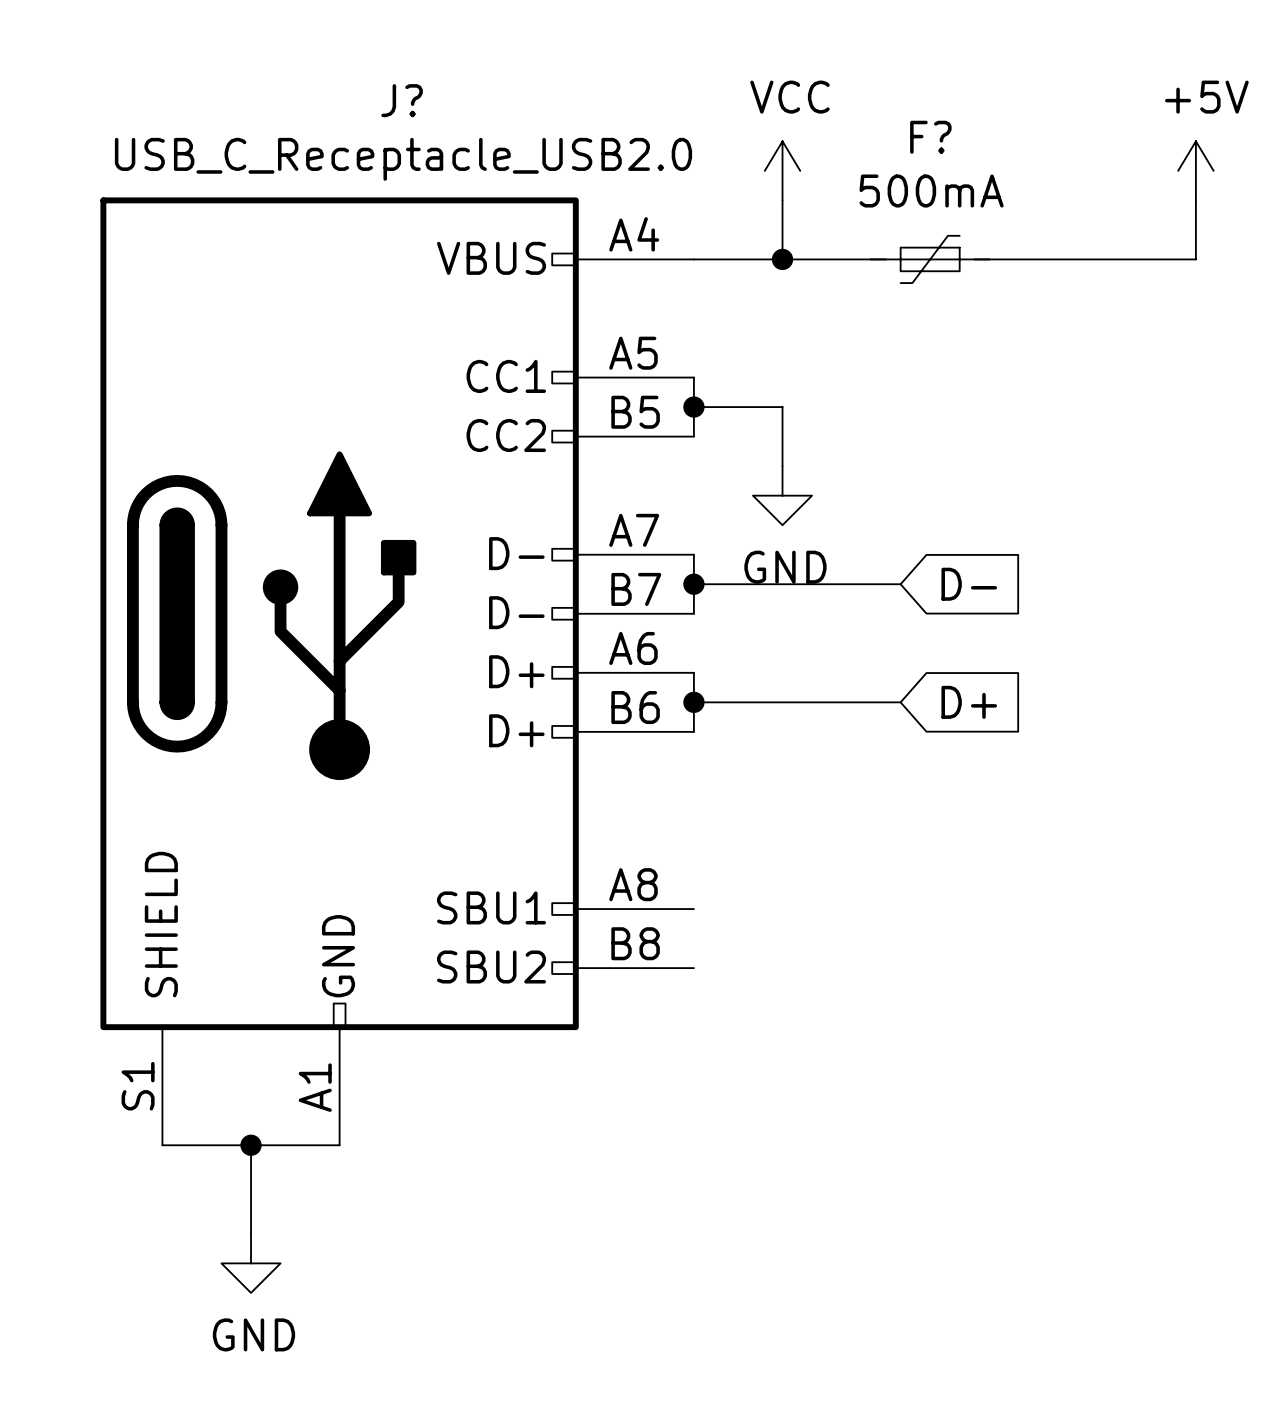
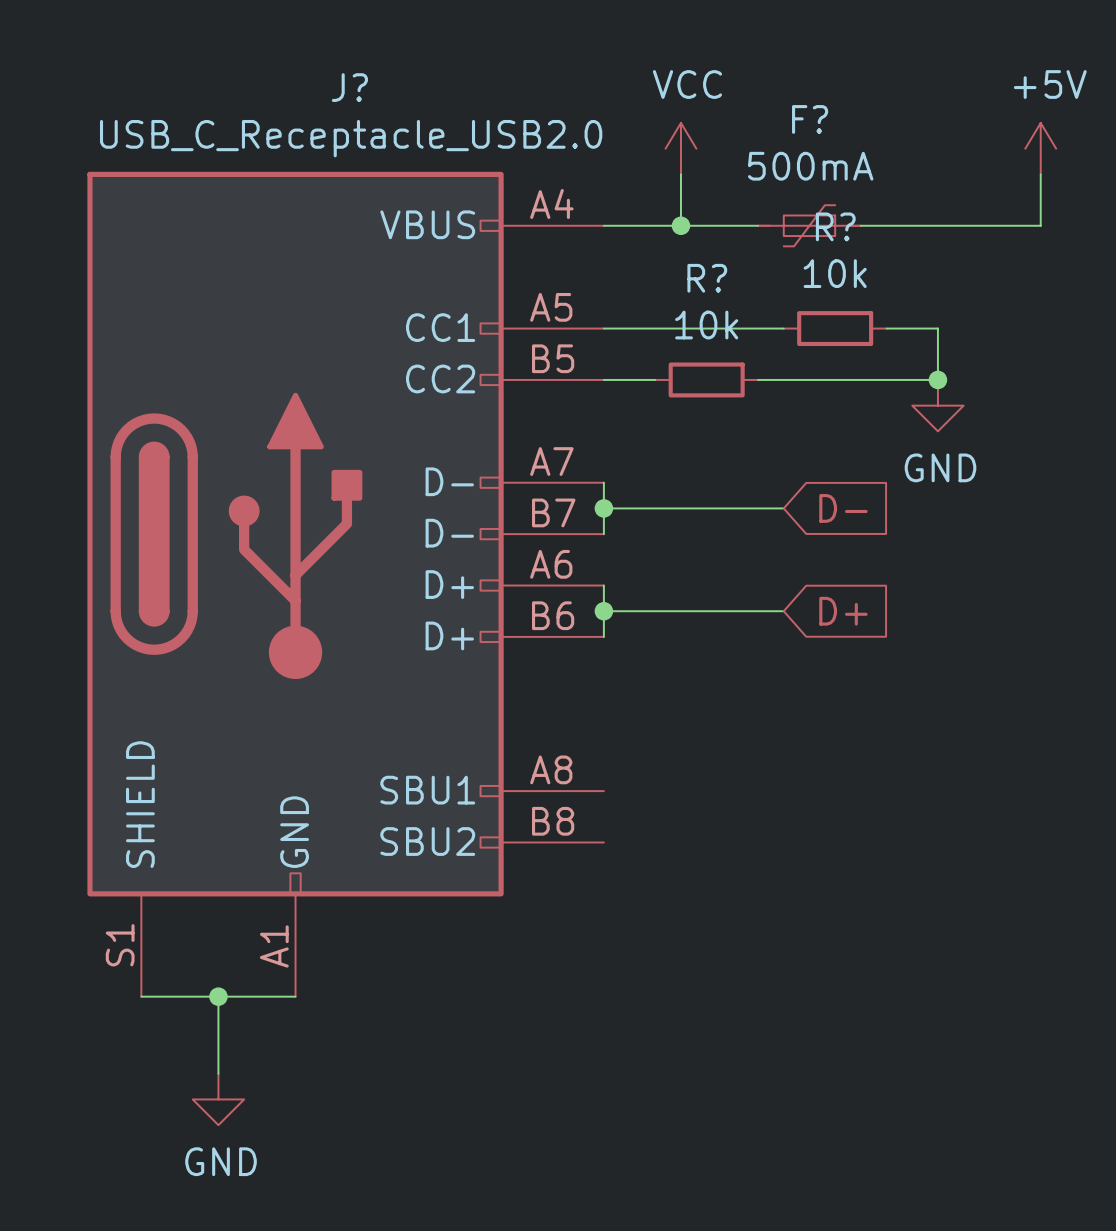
wire: (693, 377) (693, 436) -> (655, 379) (603, 379)
wire: none -> (603, 328) (783, 328)
R?: none -> 10k (835, 328)
wire: none -> (886, 328) (937, 328) (937, 379) (758, 379)
wire: (693, 407) (782, 407) (782, 466) -> none
junction: (693, 407) -> none
R?: none -> 10k (706, 379)
junction: none -> (937, 379)
power symbol position: GND (782, 495) -> GND (937, 405)

